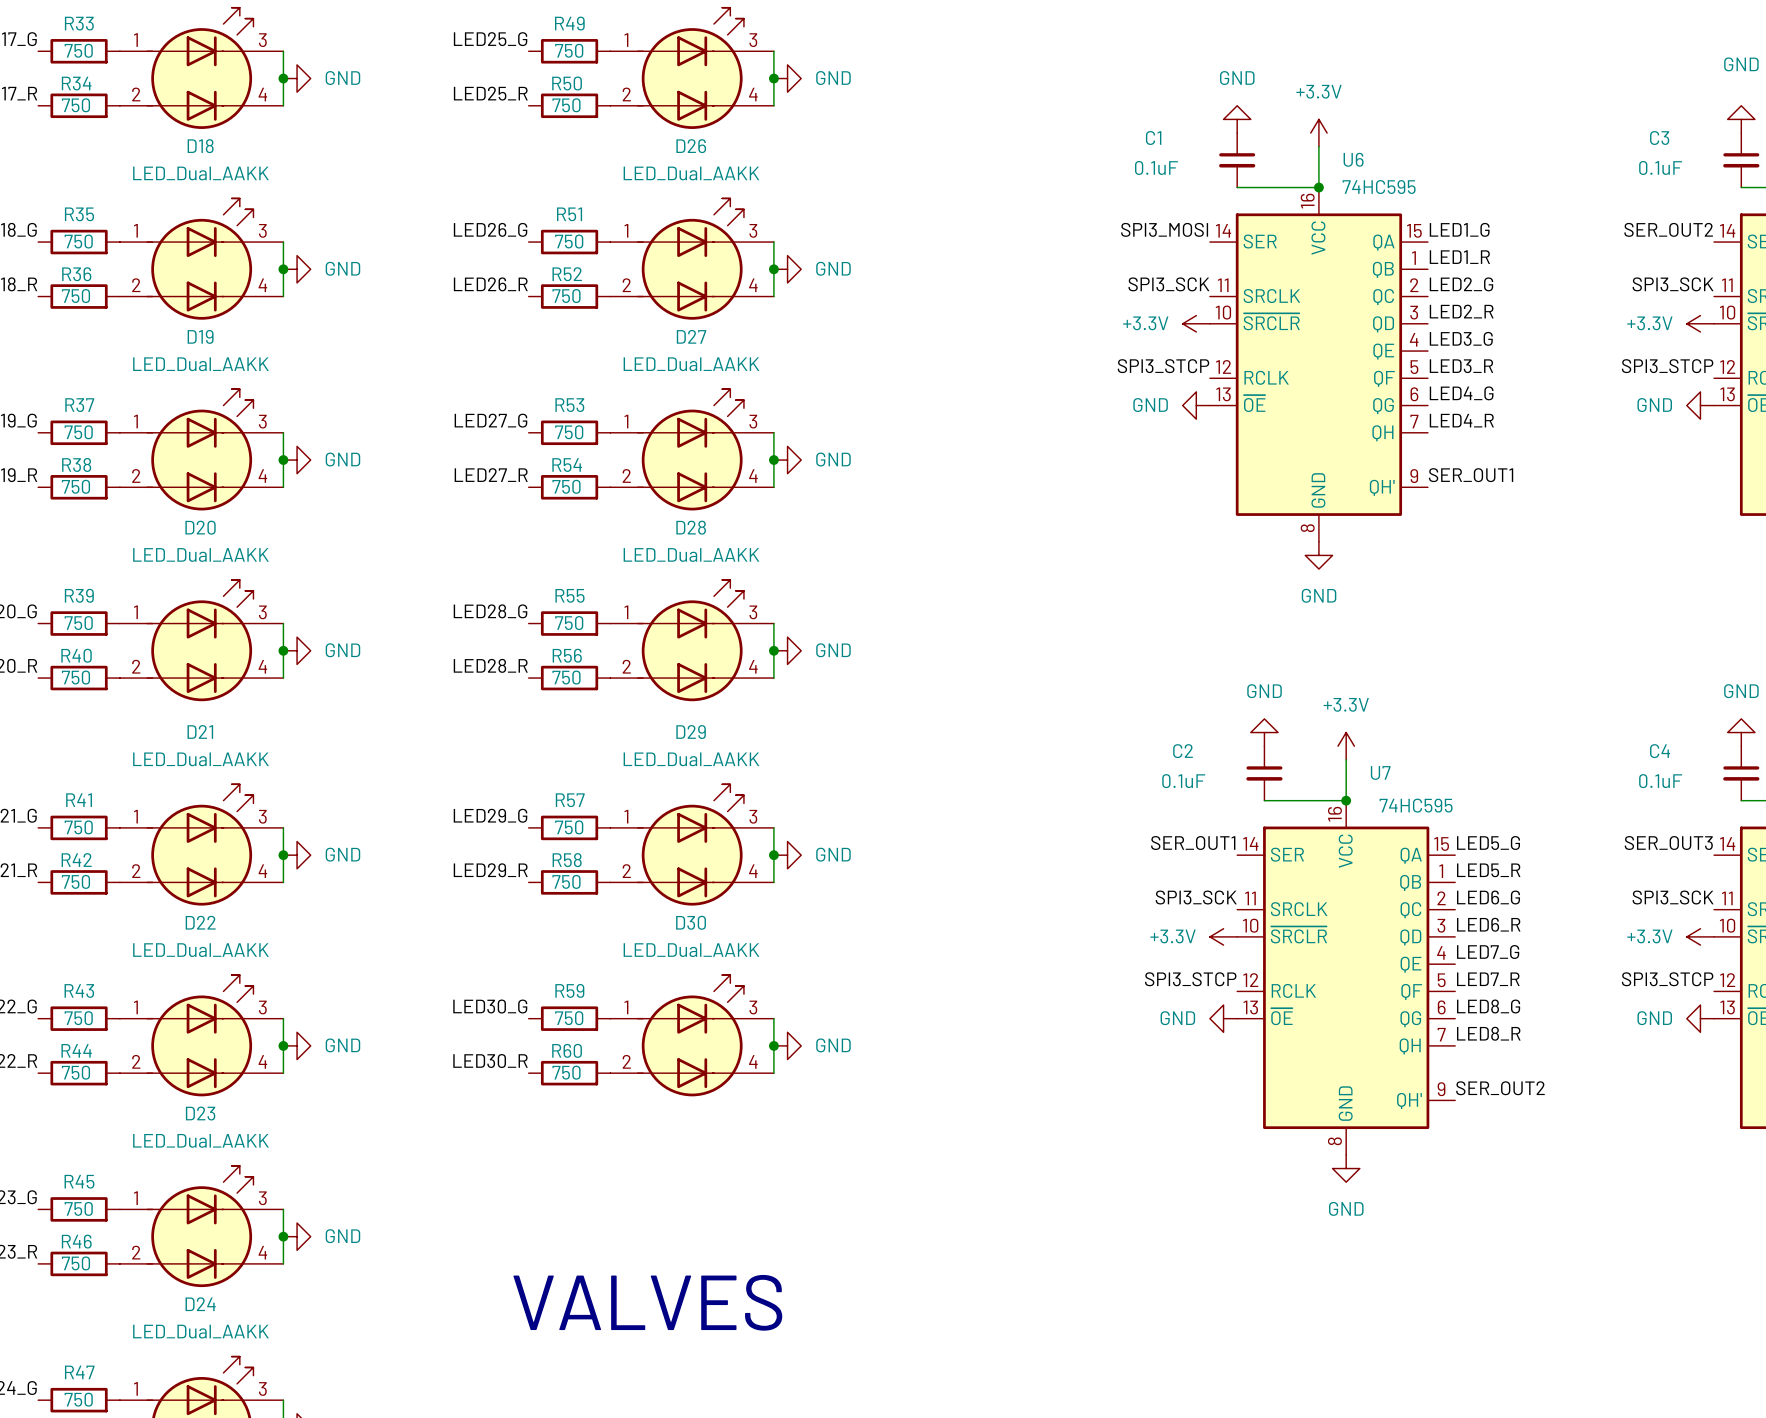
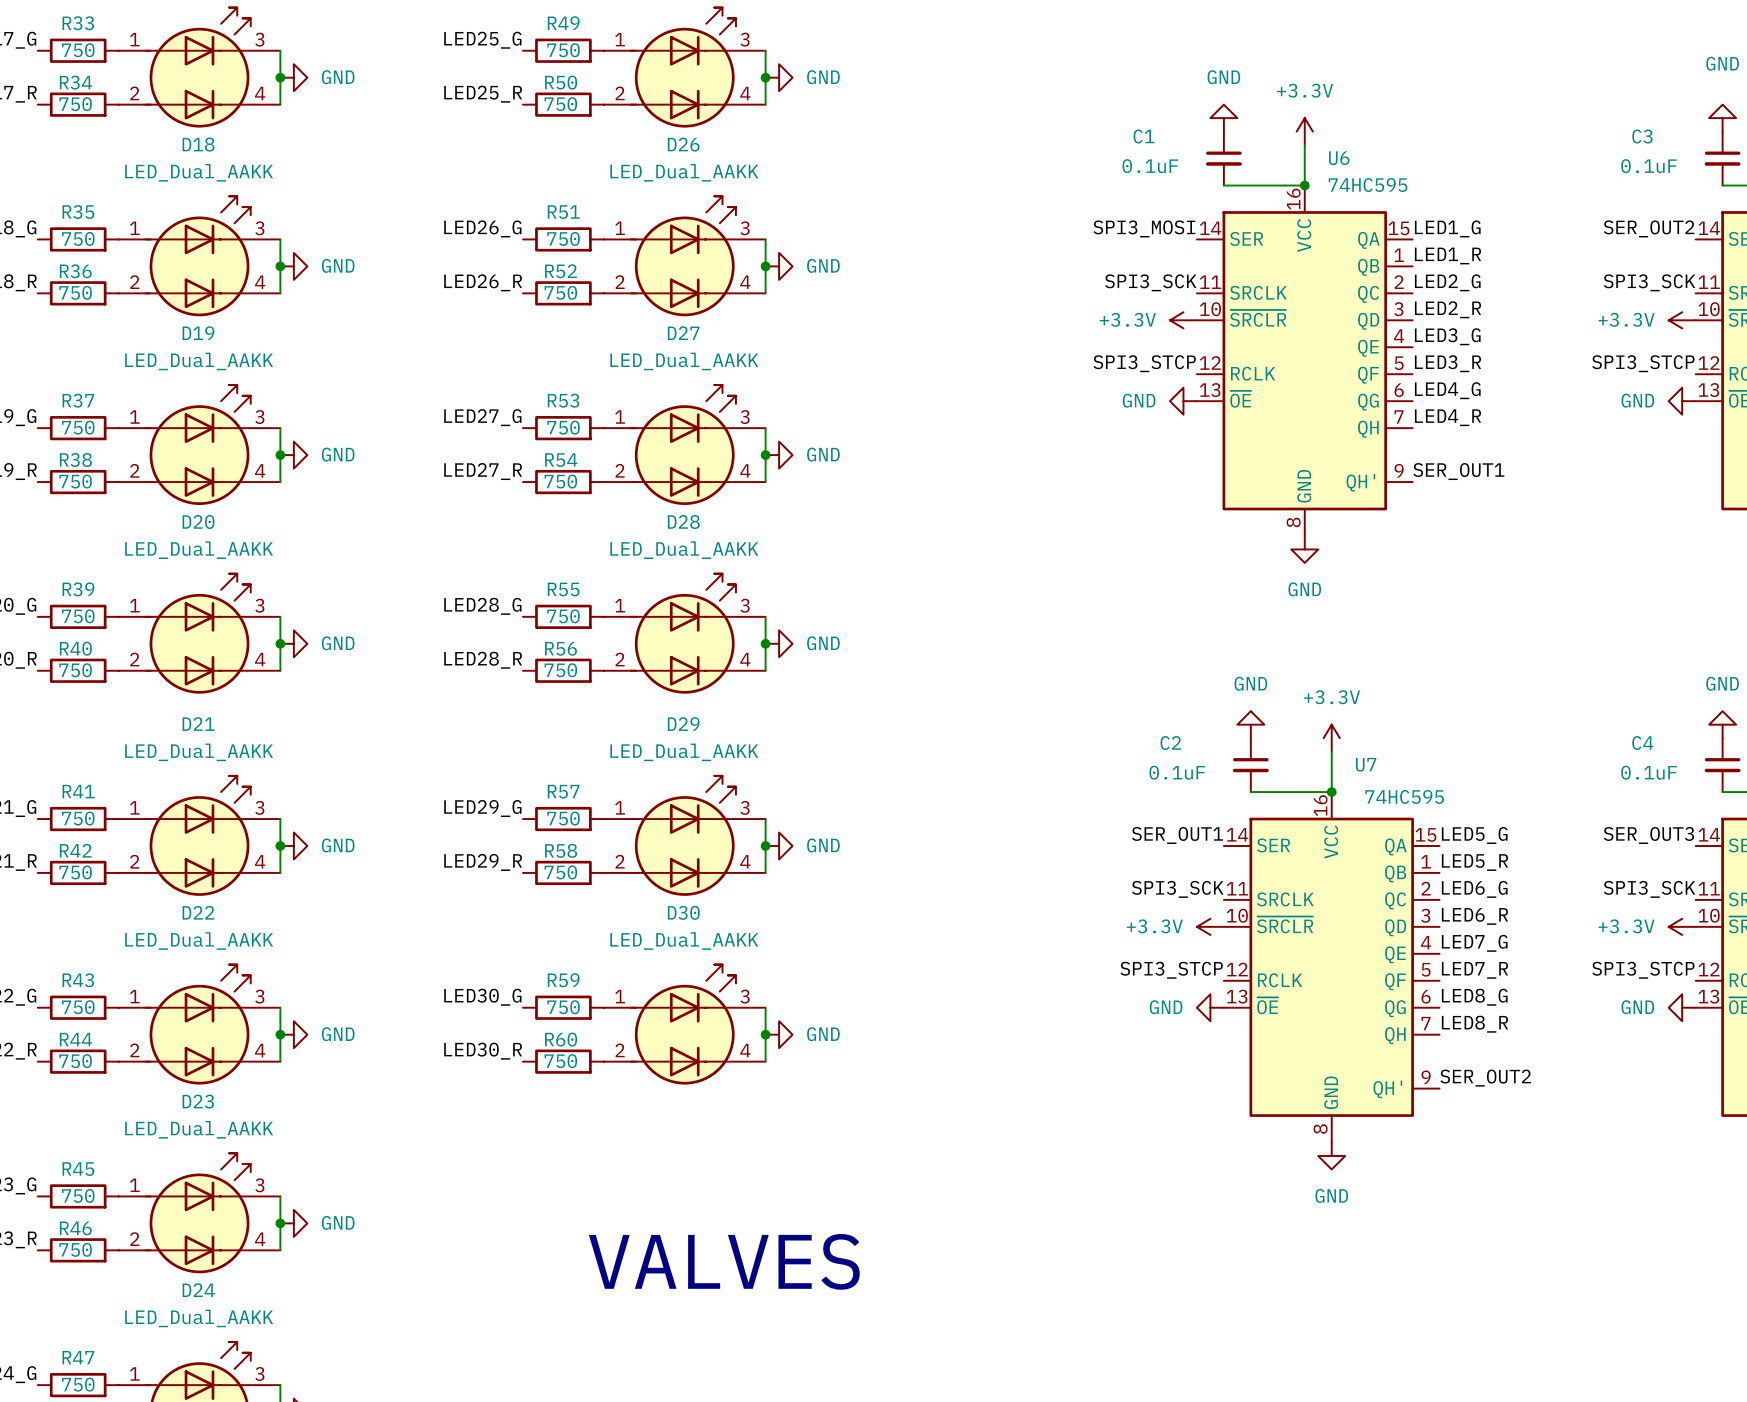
text position: VALVES (647, 1302) -> VALVES (724, 1261)

